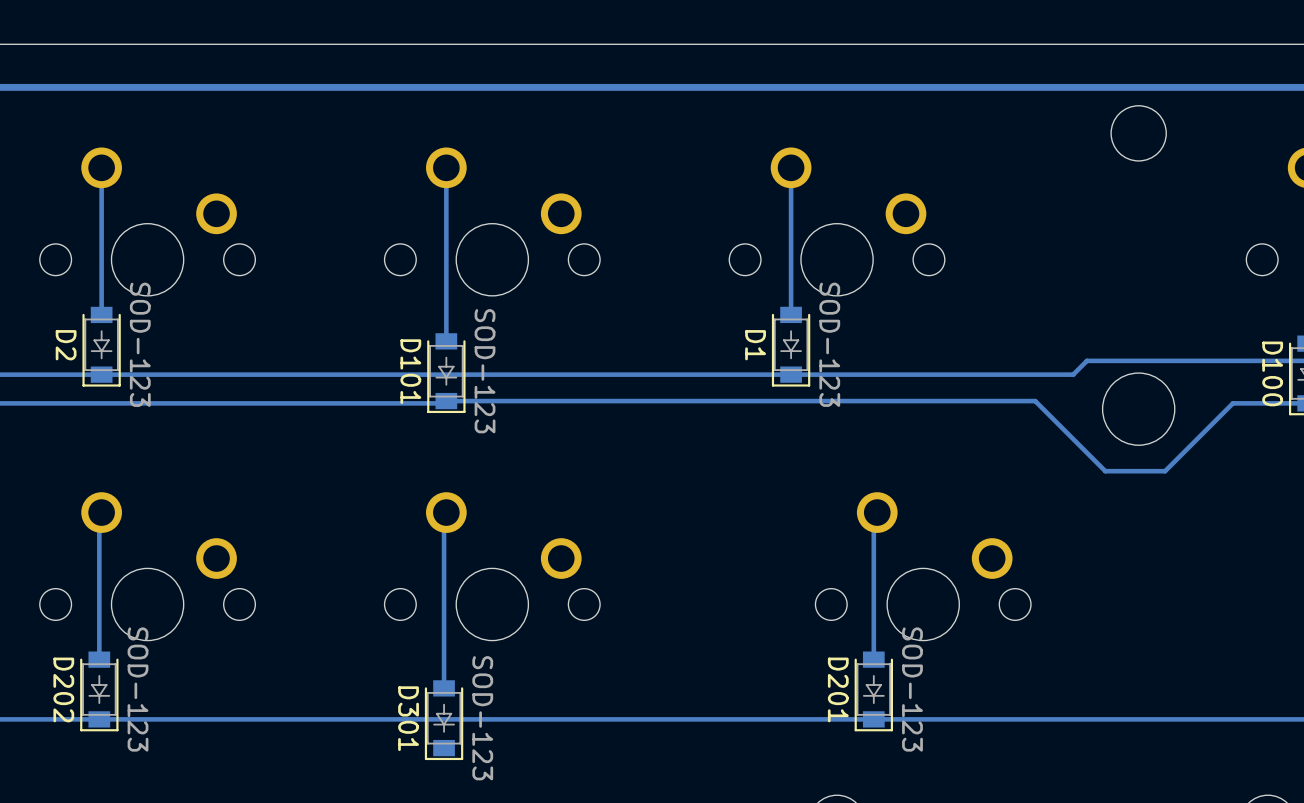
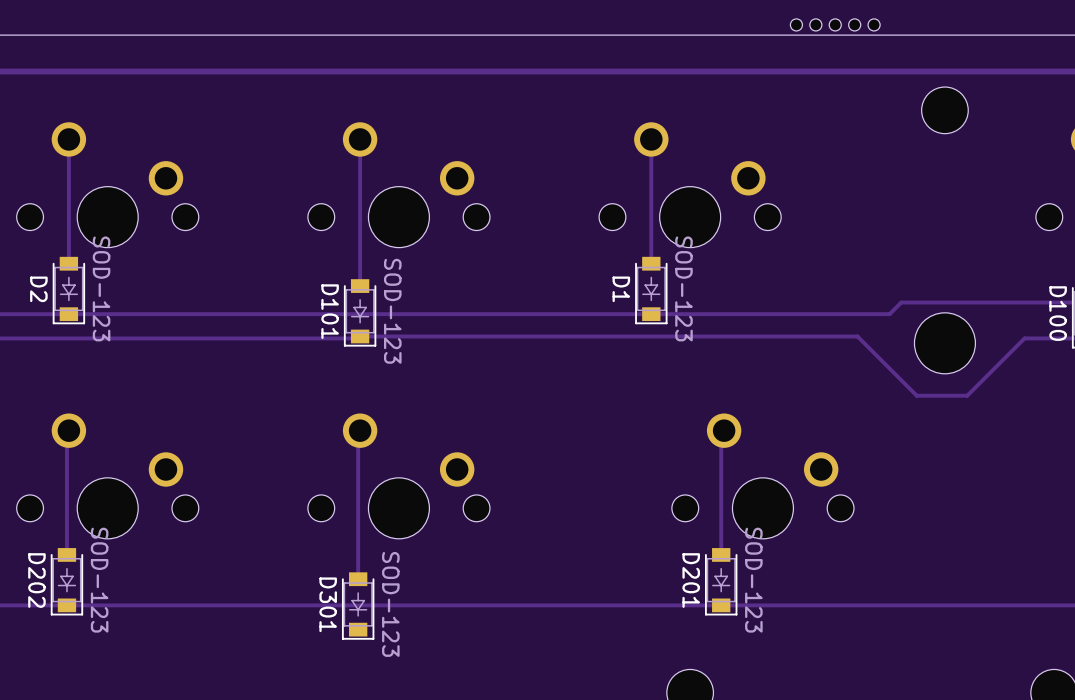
part: none -> (835, 24)

